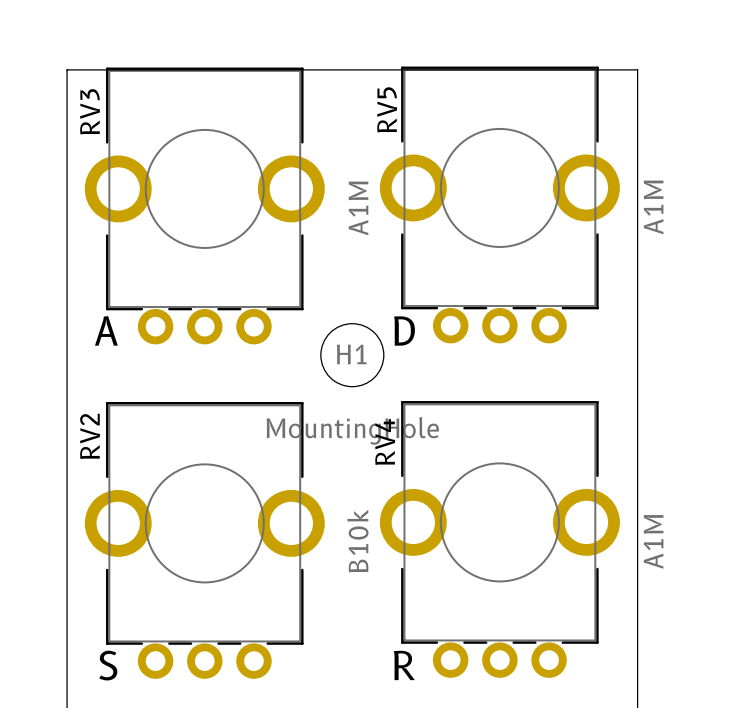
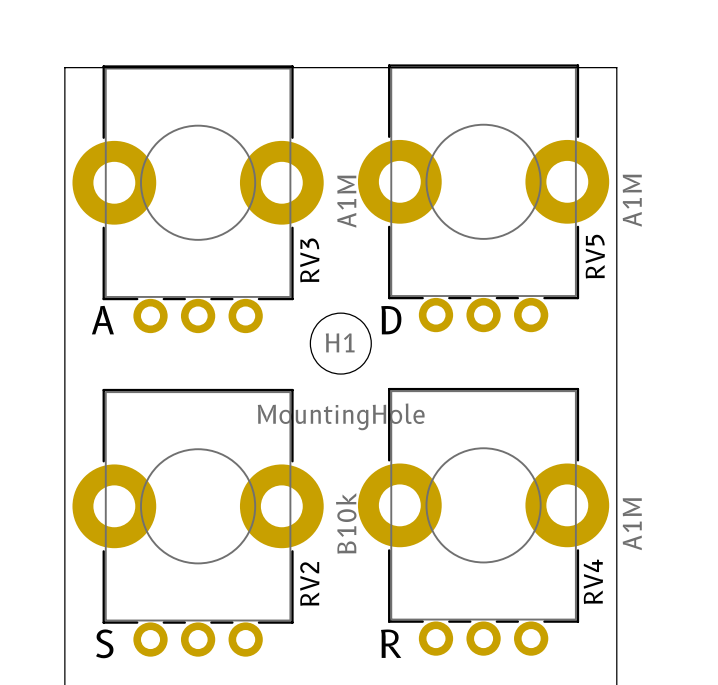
RV5 footprint: [379, 66, 620, 344] -> [357, 64, 610, 333]
RV3 footprint: [84, 67, 325, 345] -> [72, 65, 324, 334]
RV5 name position: RV5 (387, 109) -> RV5 (595, 256)
RV3 name position: RV3 (90, 111) -> RV3 (309, 260)
RV4 footprint: [379, 401, 620, 678] -> [357, 387, 610, 656]
RV2 footprint: [84, 402, 325, 679] -> [72, 388, 324, 657]
RV2 name position: RV2 (90, 436) -> RV2 (309, 583)
RV4 name position: RV4 (385, 442) -> RV4 (593, 581)

